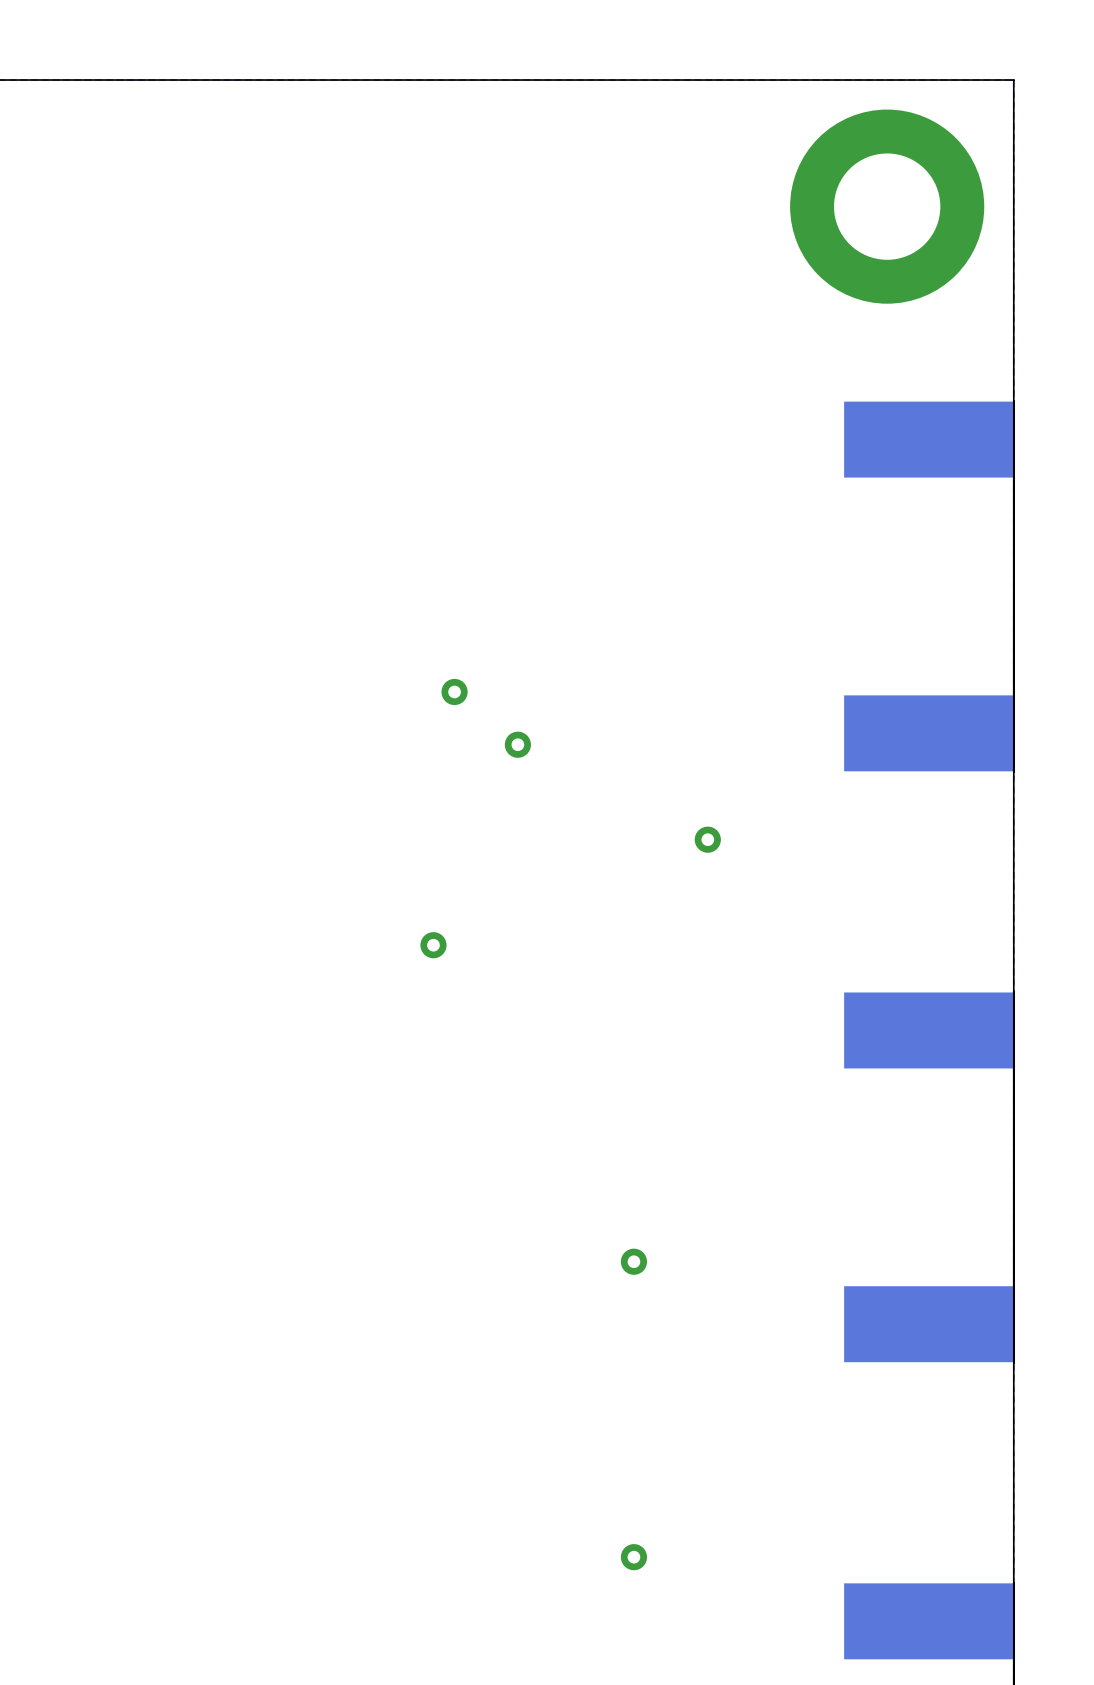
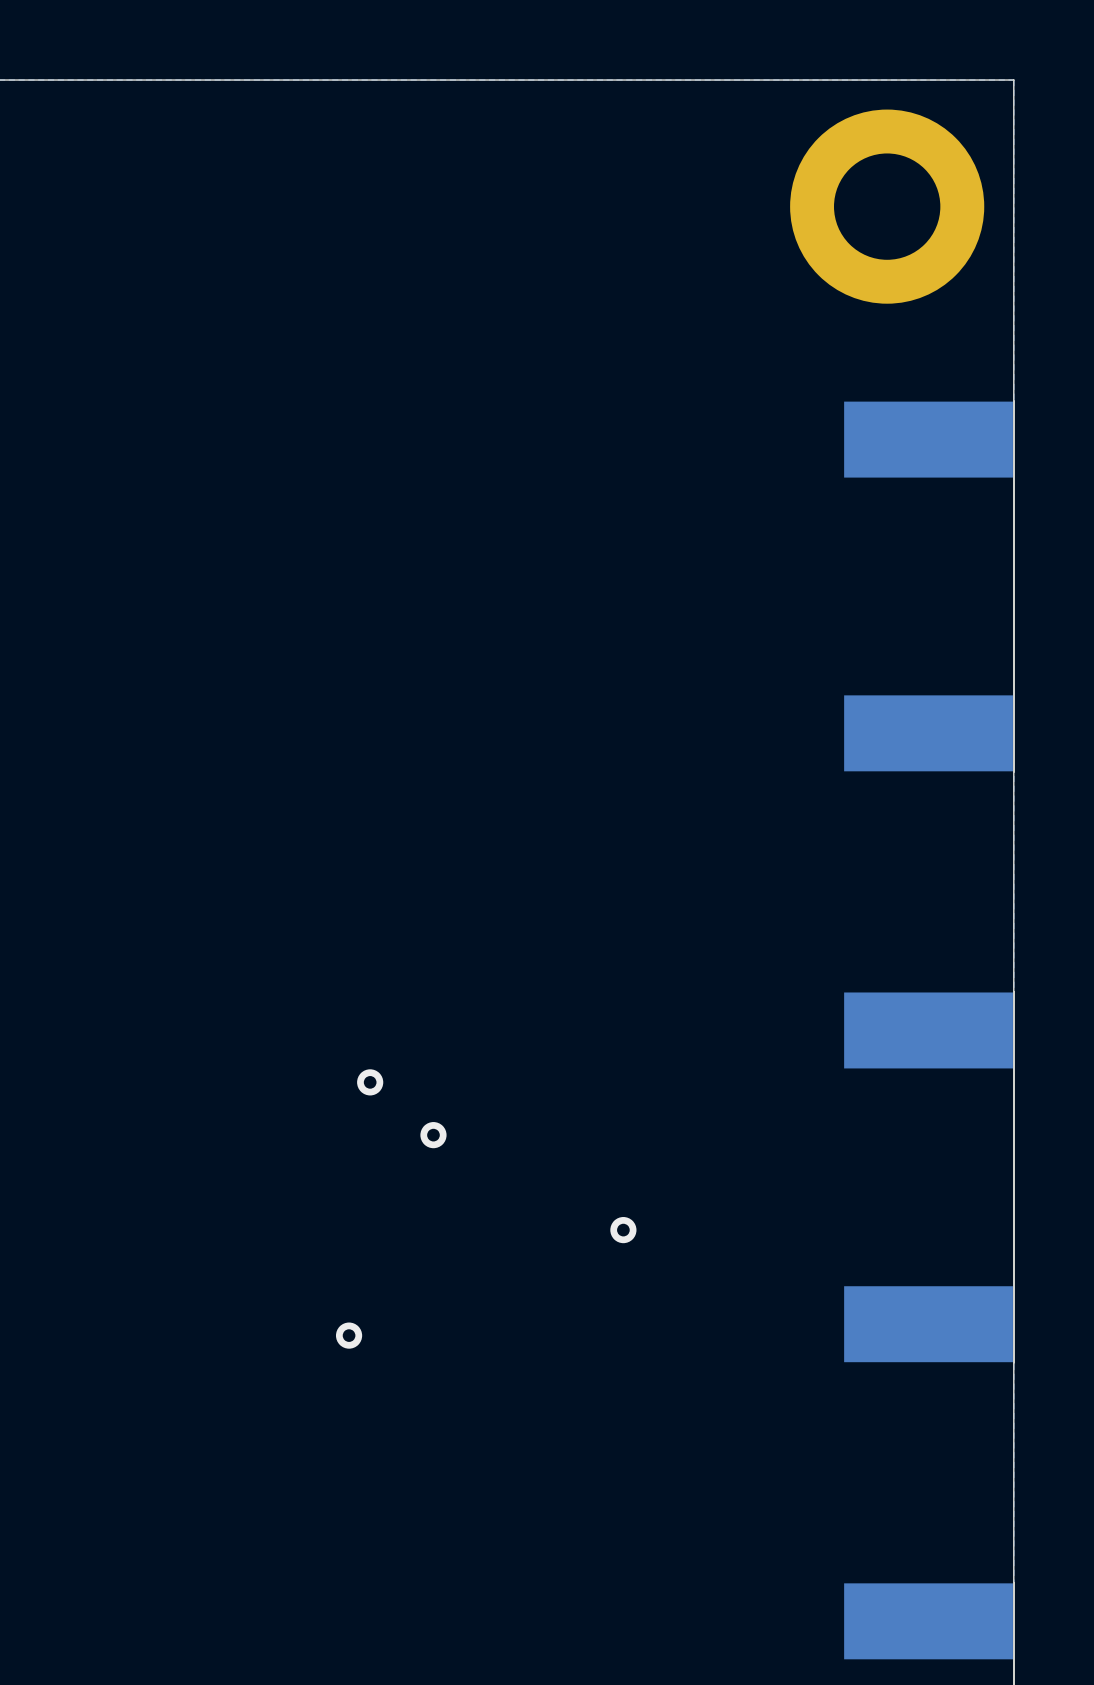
via: (454, 691) -> none
via: (517, 744) -> none
via: (707, 839) -> none
via: (433, 945) -> none
via: none -> (370, 1082)
via: none -> (433, 1135)
via position: (633, 1261) -> (623, 1230)
via: none -> (349, 1335)
via: (633, 1557) -> none

